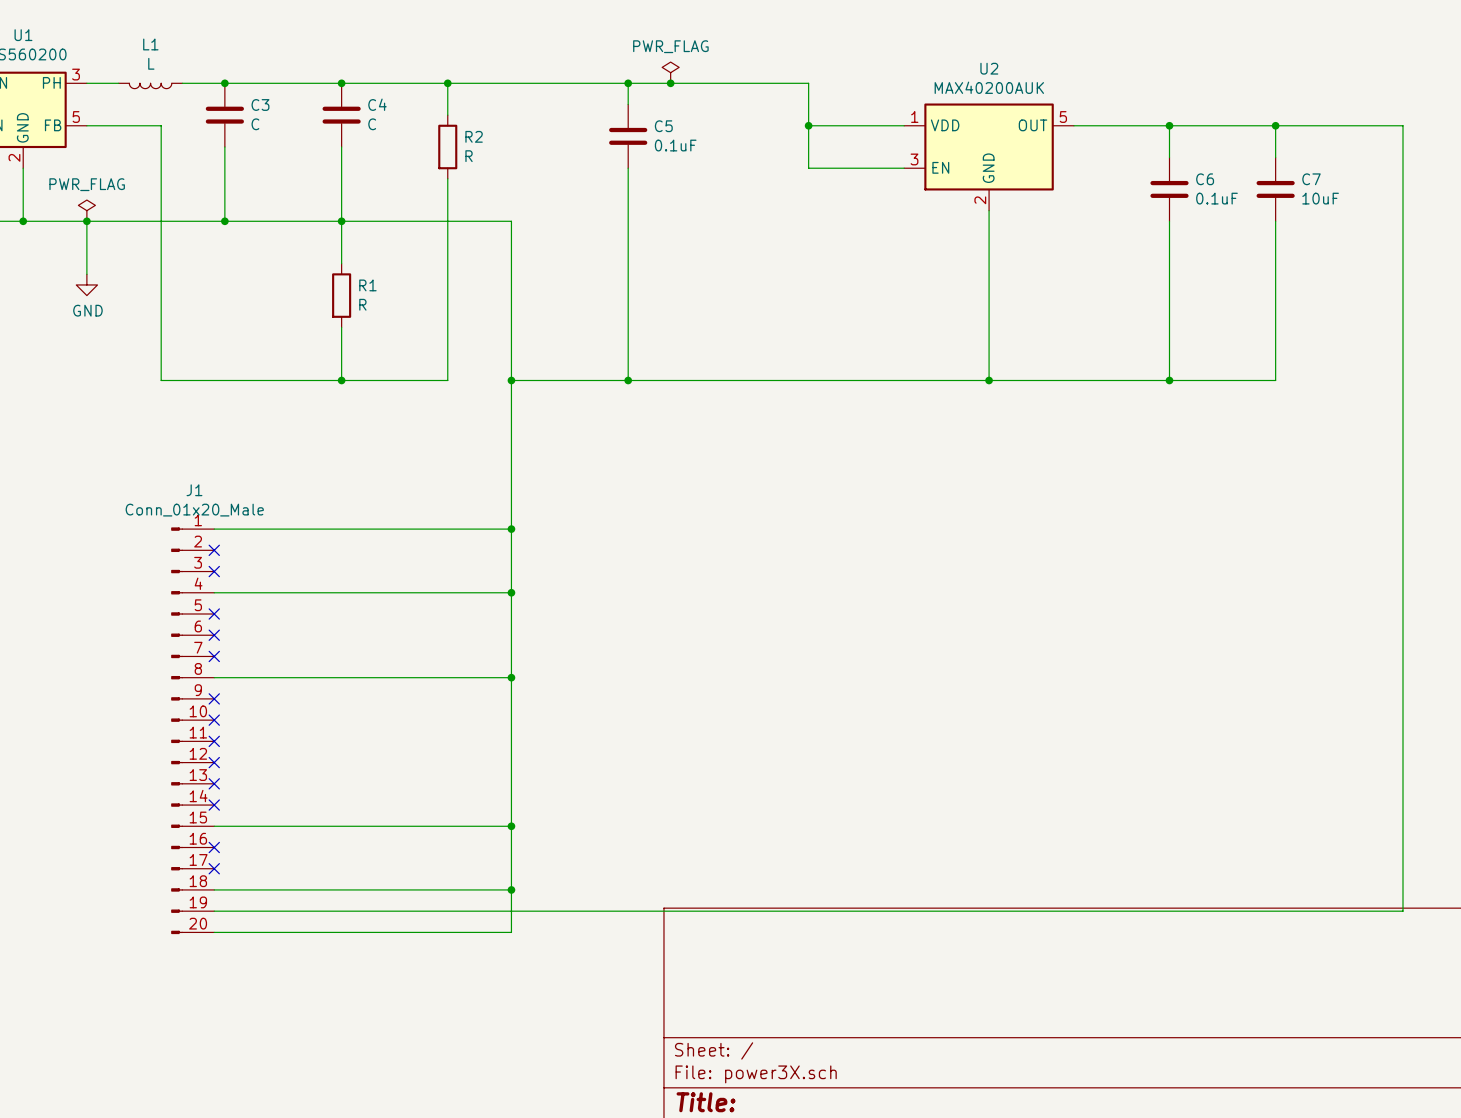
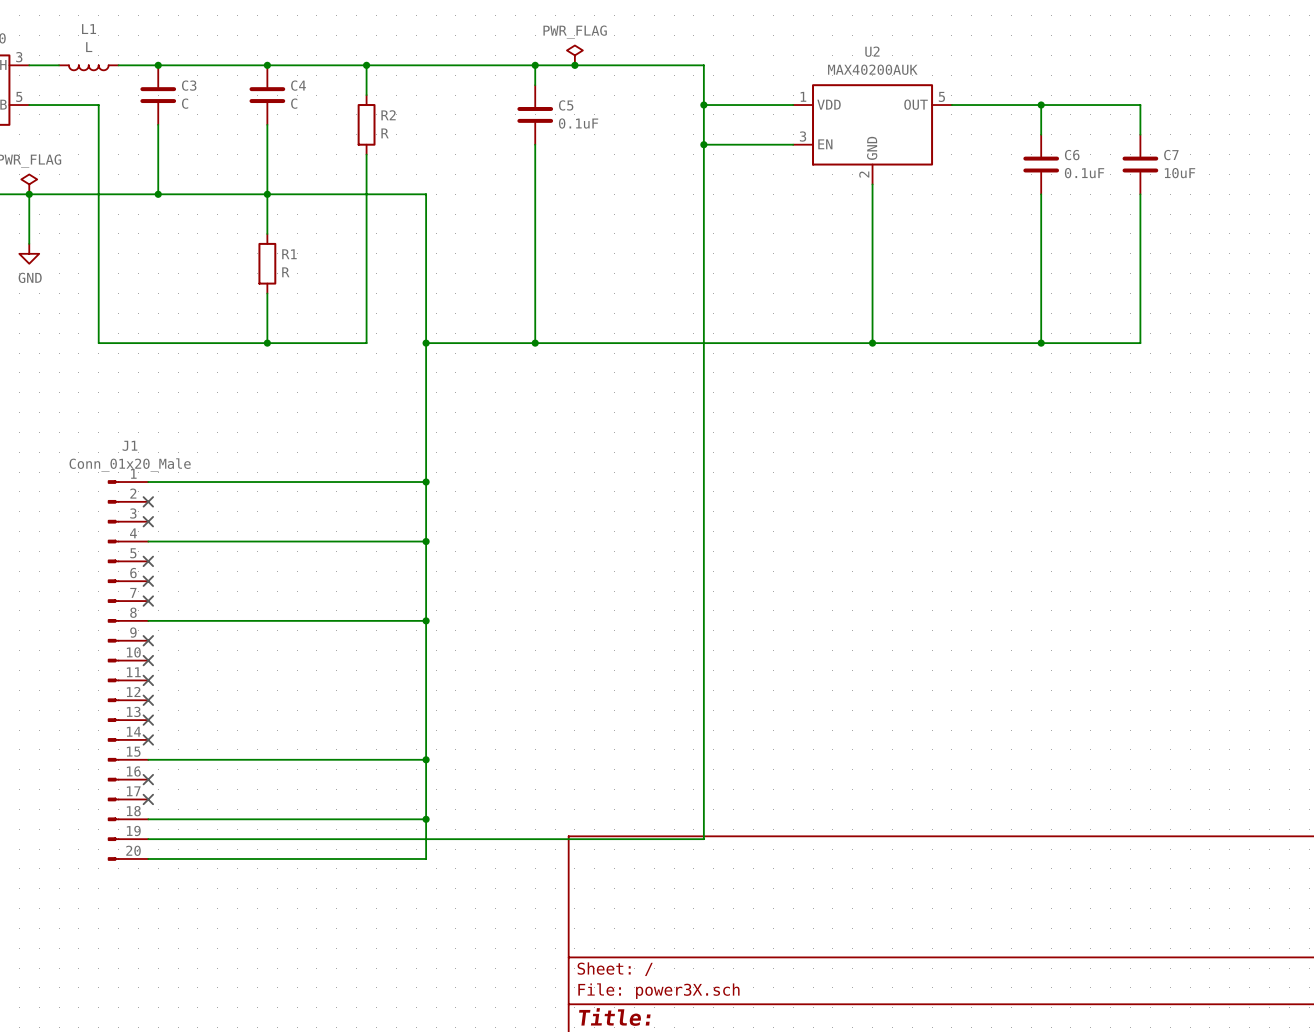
wire: (1275, 125) (1403, 125) (1403, 911) (808, 911) -> (703, 144) (703, 839)
junction: (1275, 125) -> none
junction: none -> (703, 144)

